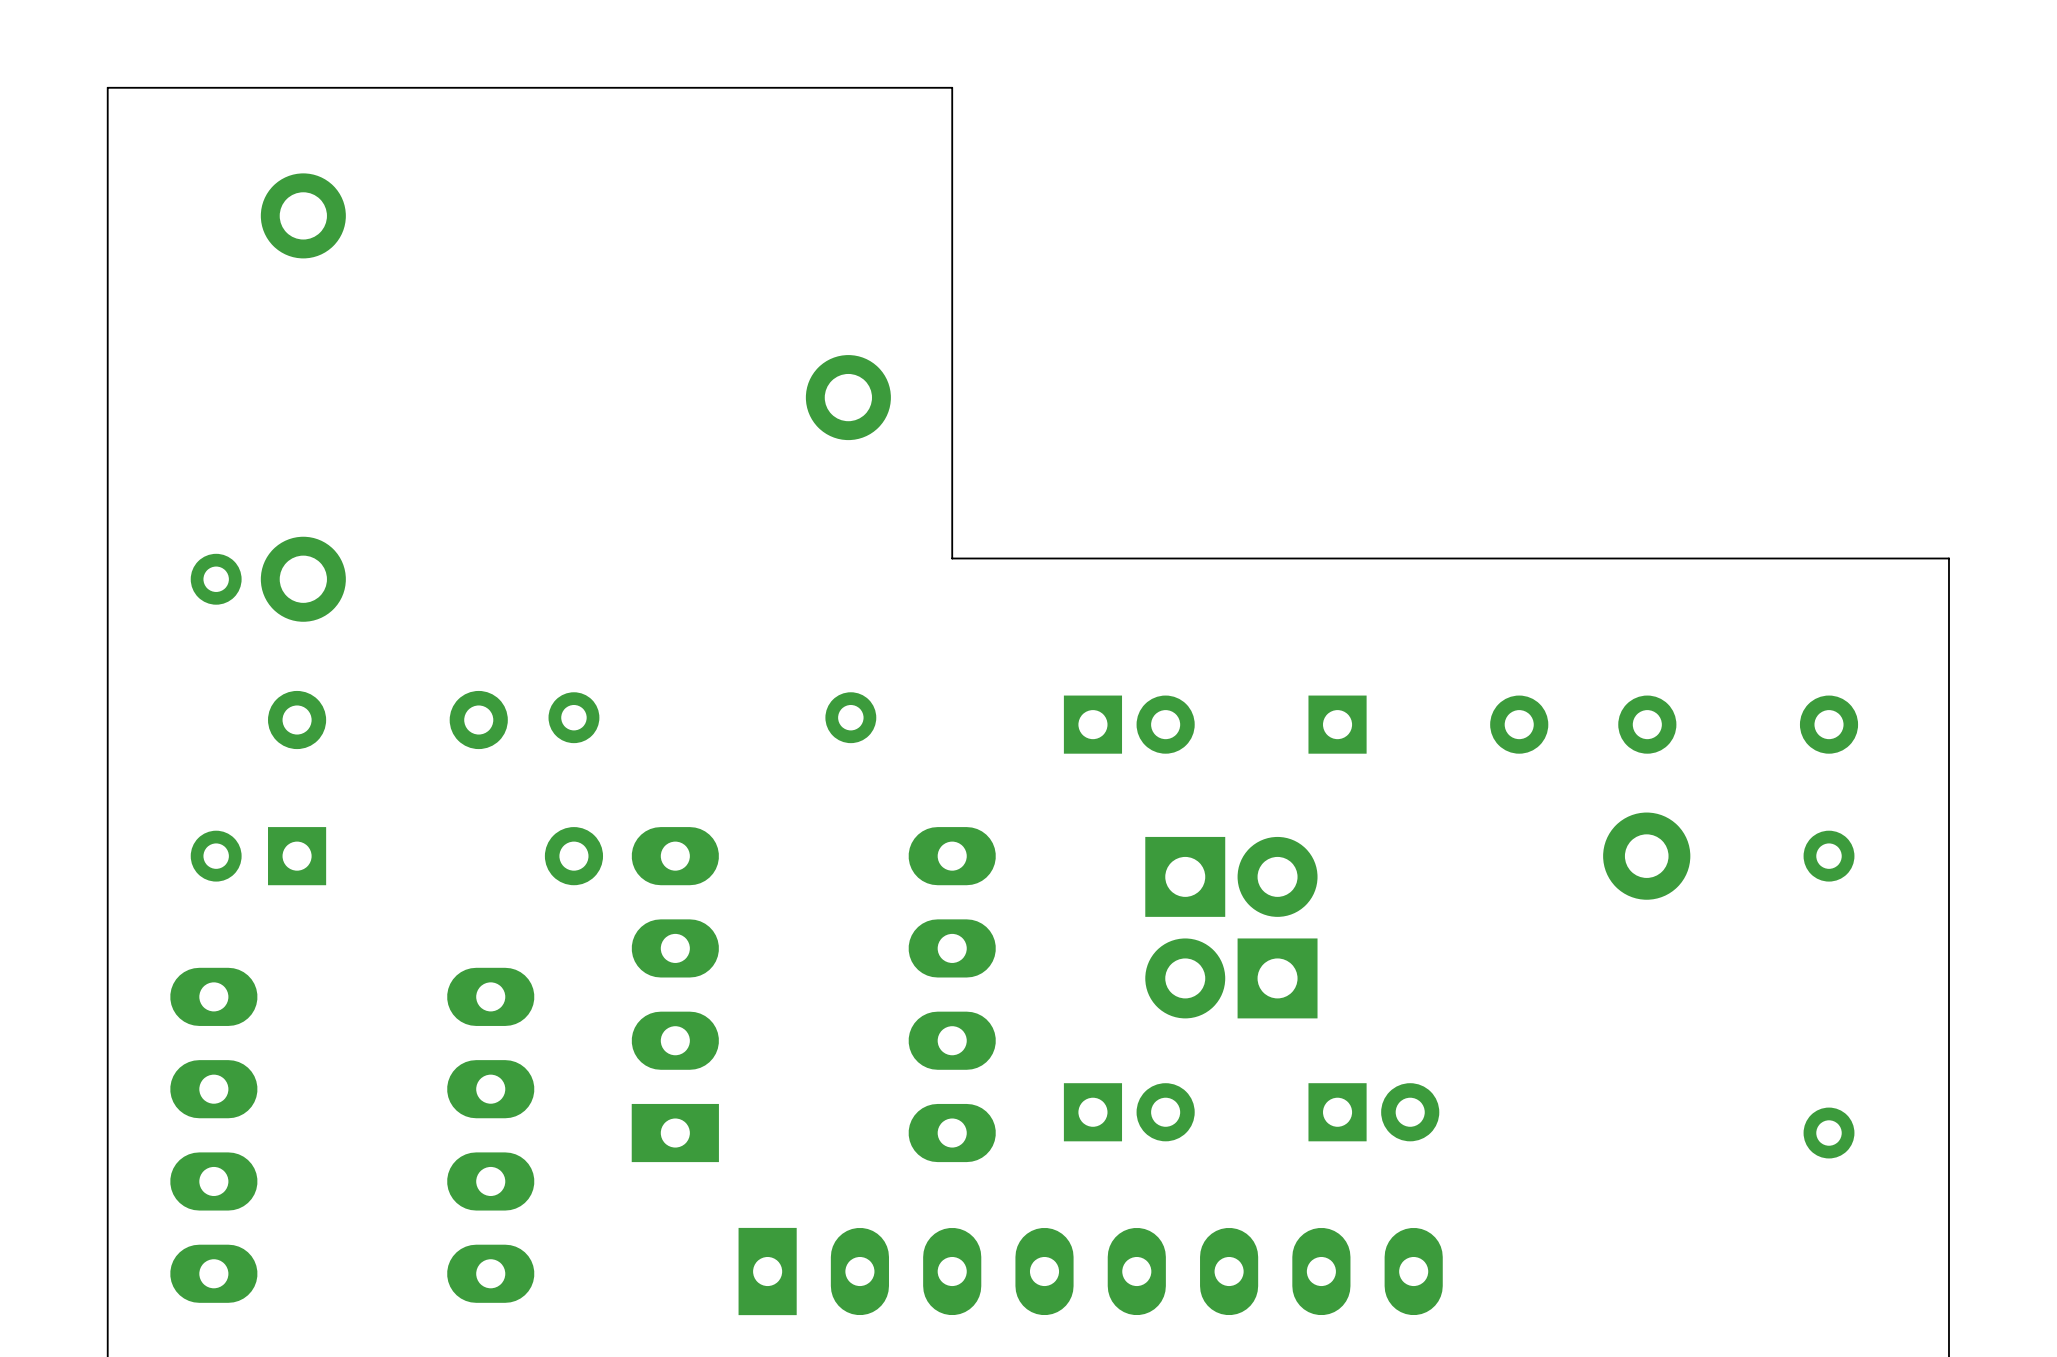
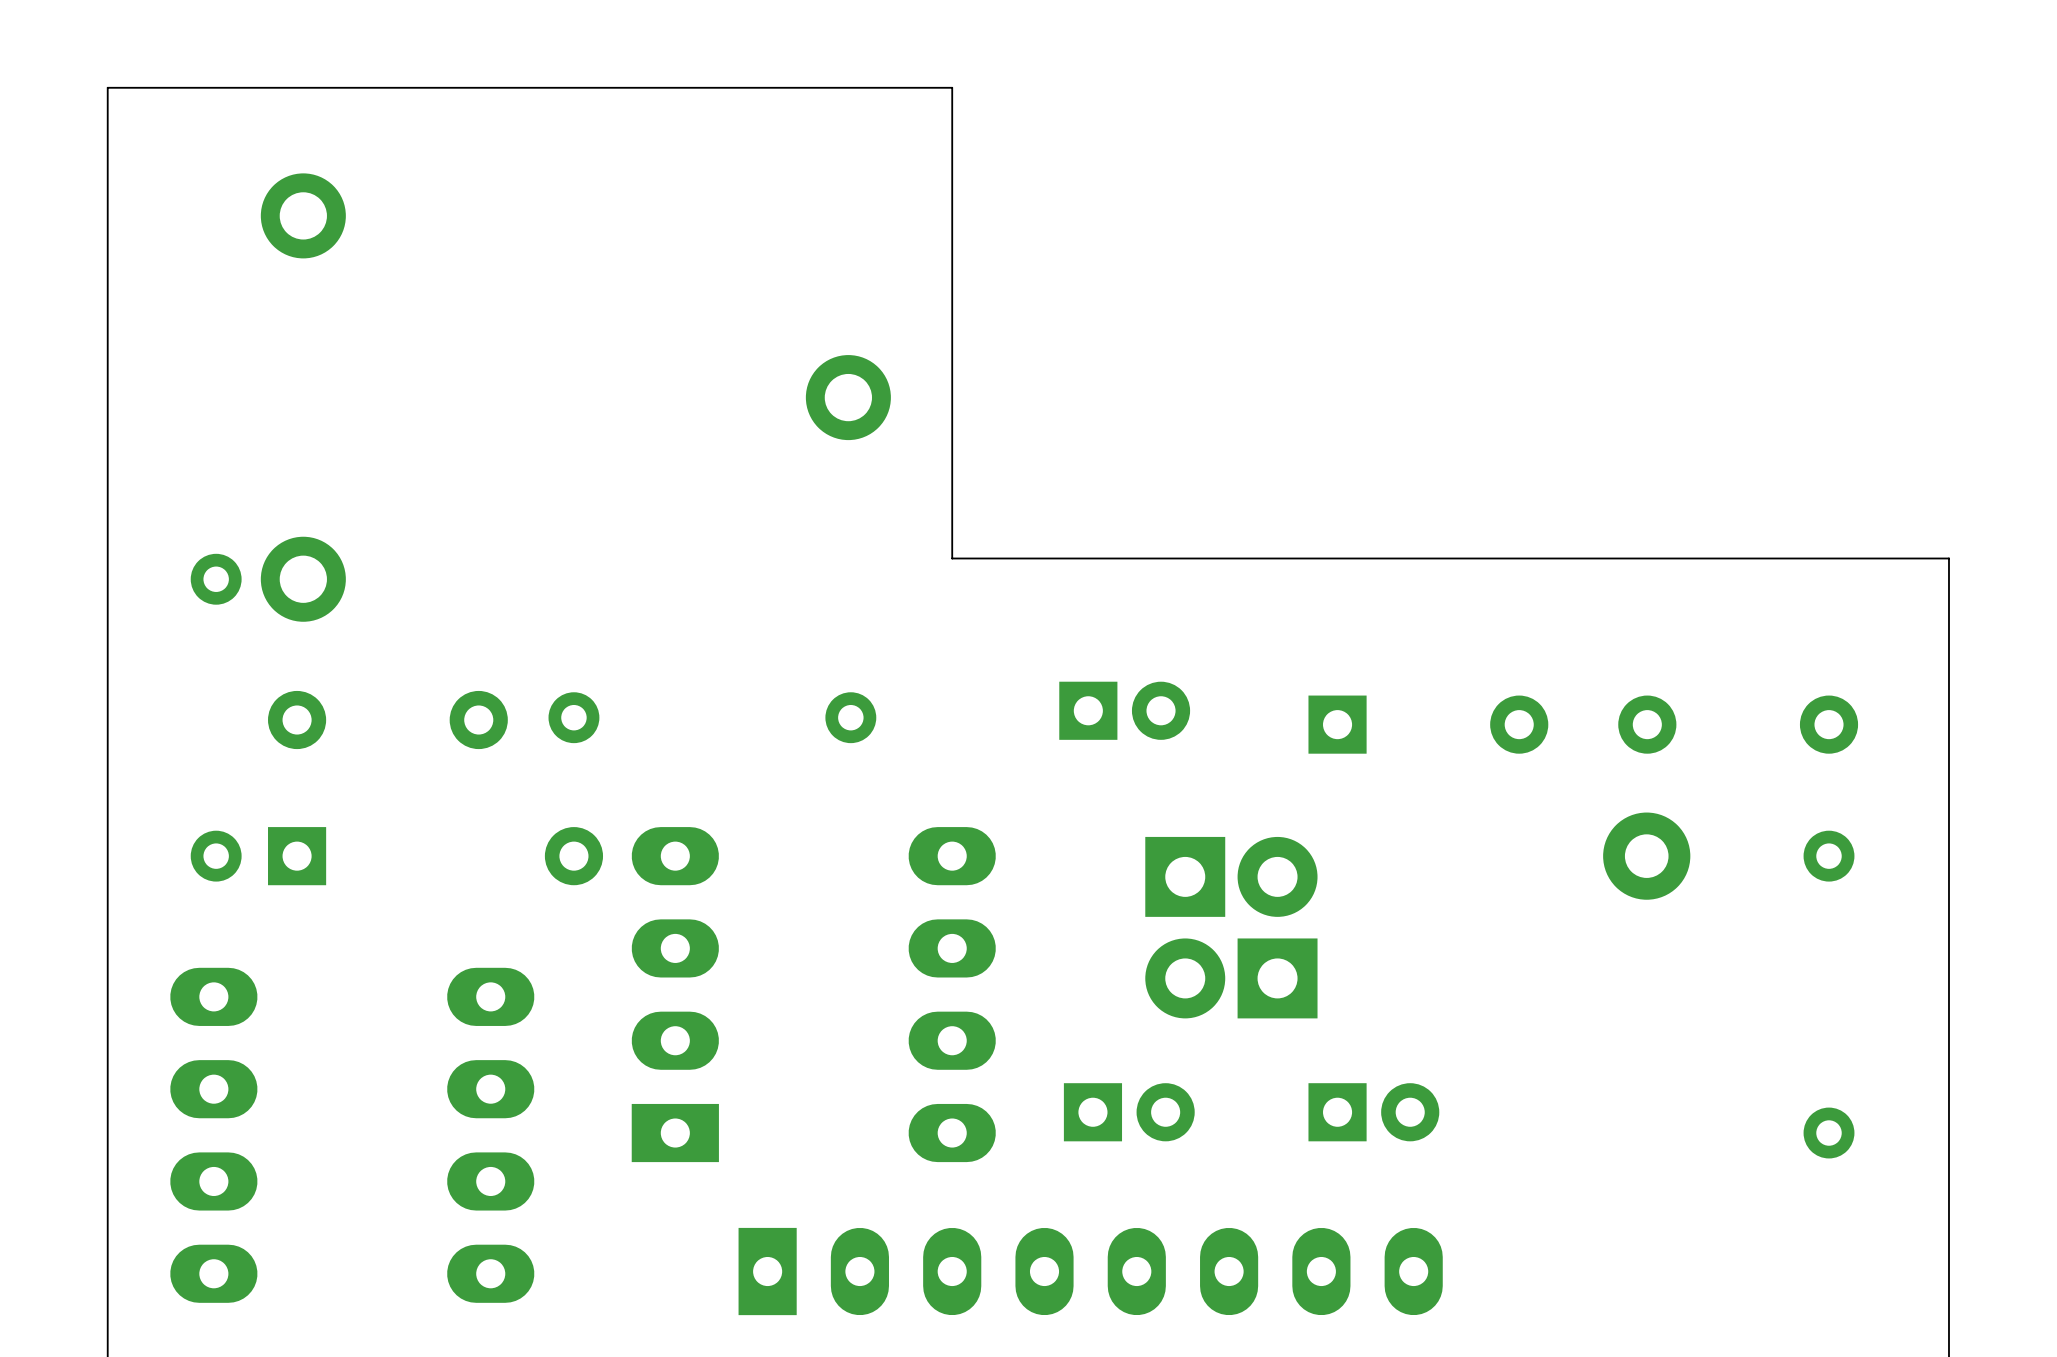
part position: (1129, 724) -> (1124, 710)

